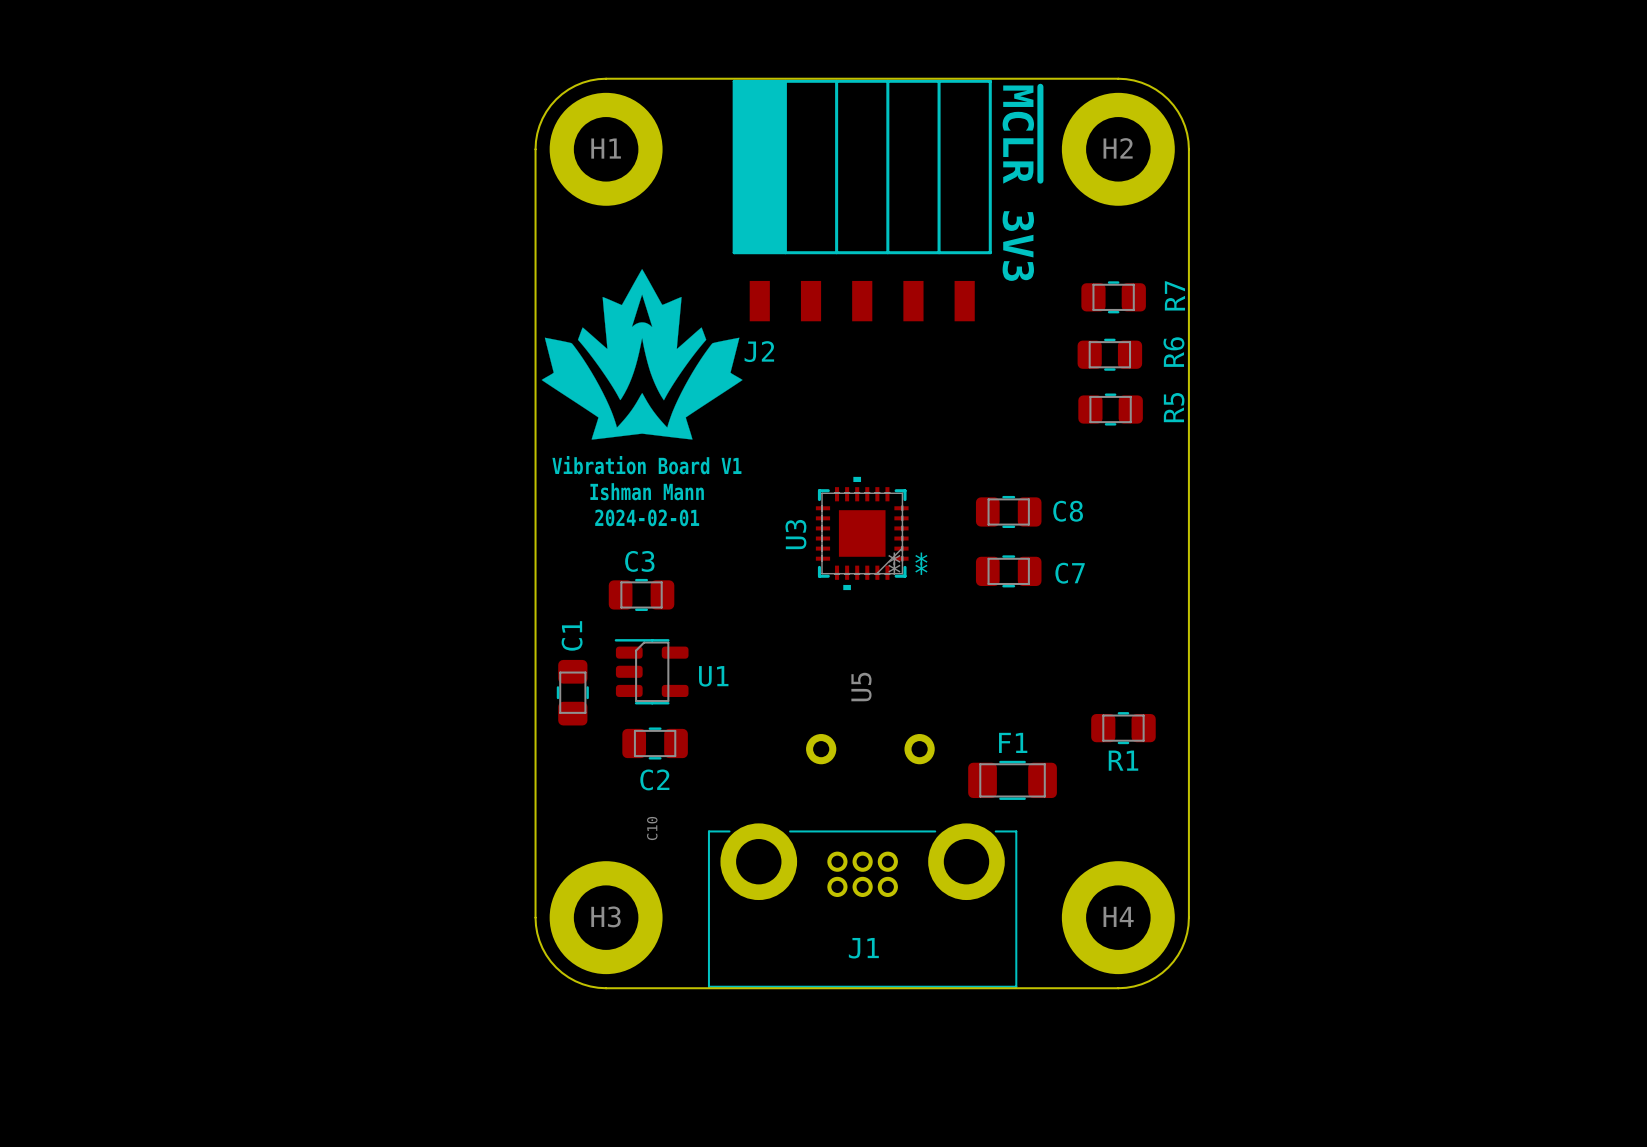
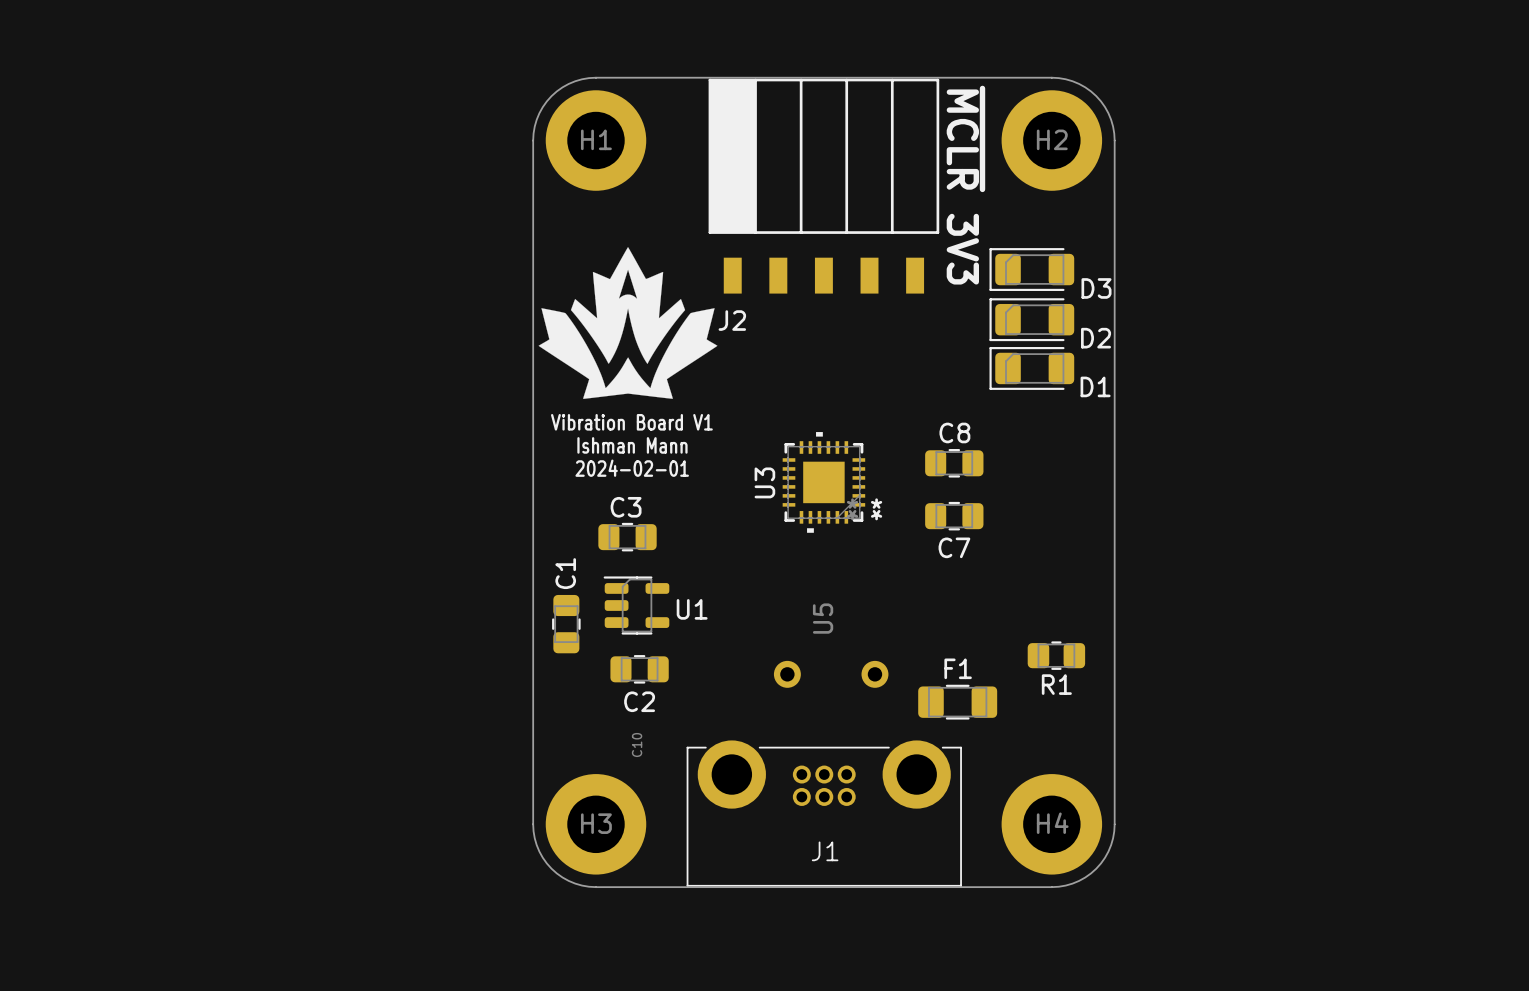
D3: none -> (1031, 269)
R7: (1113, 297) -> none
D2: none -> (1031, 319)
R6: (1109, 354) -> none
D1: none -> (1031, 368)
R5: (1110, 409) -> none
C8 name position: C8 (1068, 511) -> C8 (954, 432)
C7 name position: C7 (1070, 573) -> C7 (954, 547)

